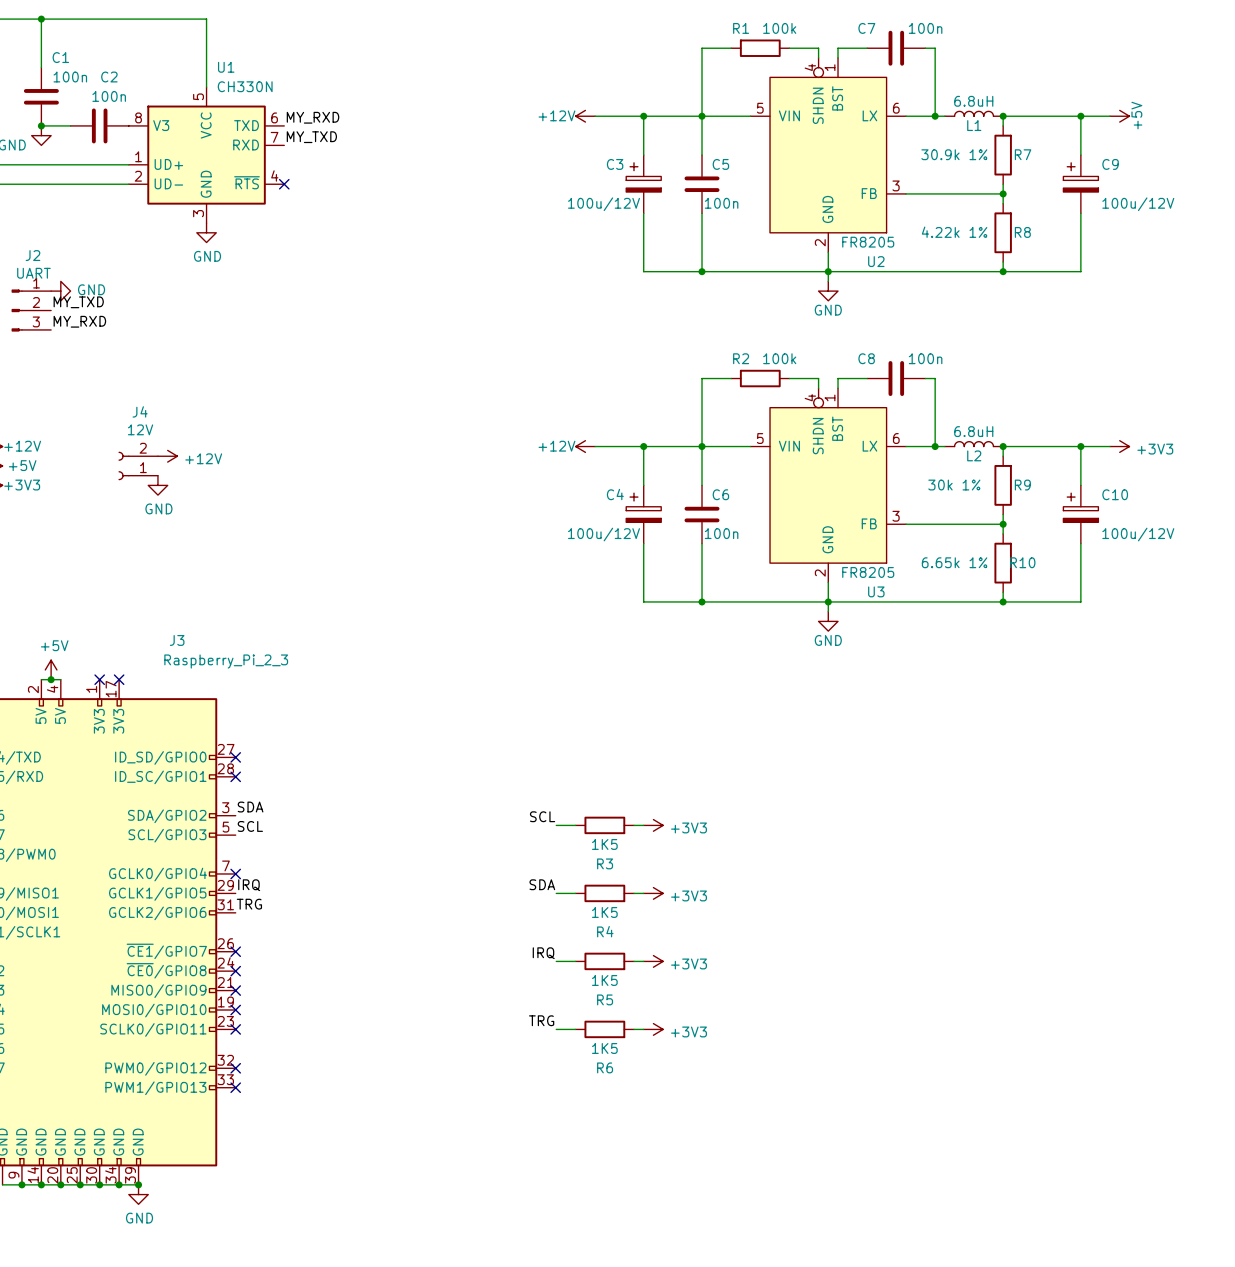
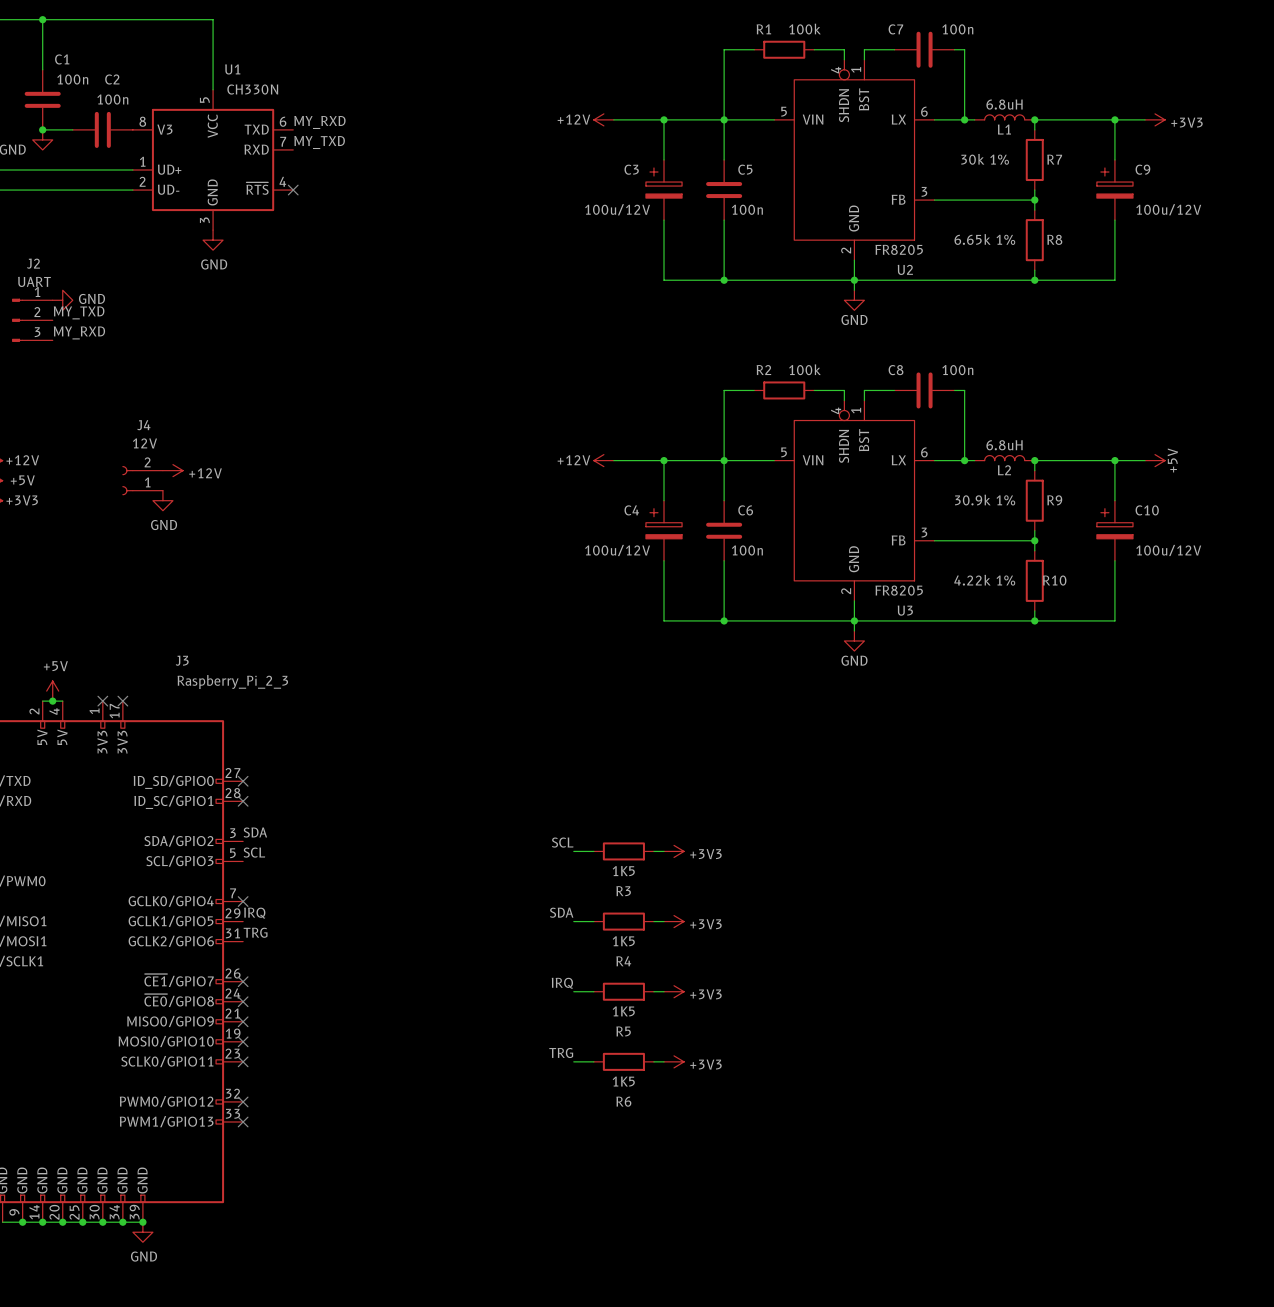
power symbol: +5V (1119, 116) -> +3V3 (1155, 119)
R7 value: 30.9k 1% (954, 154) -> 30k 1% (985, 159)
R8 value: 4.22k 1% (954, 232) -> 6.65k 1% (984, 239)
power symbol: +3V3 (1119, 446) -> +5V (1155, 460)
R9 value: 30k 1% (954, 485) -> 30.9k 1% (985, 500)
R10 value: 6.65k 1% (954, 562) -> 4.22k 1% (984, 580)

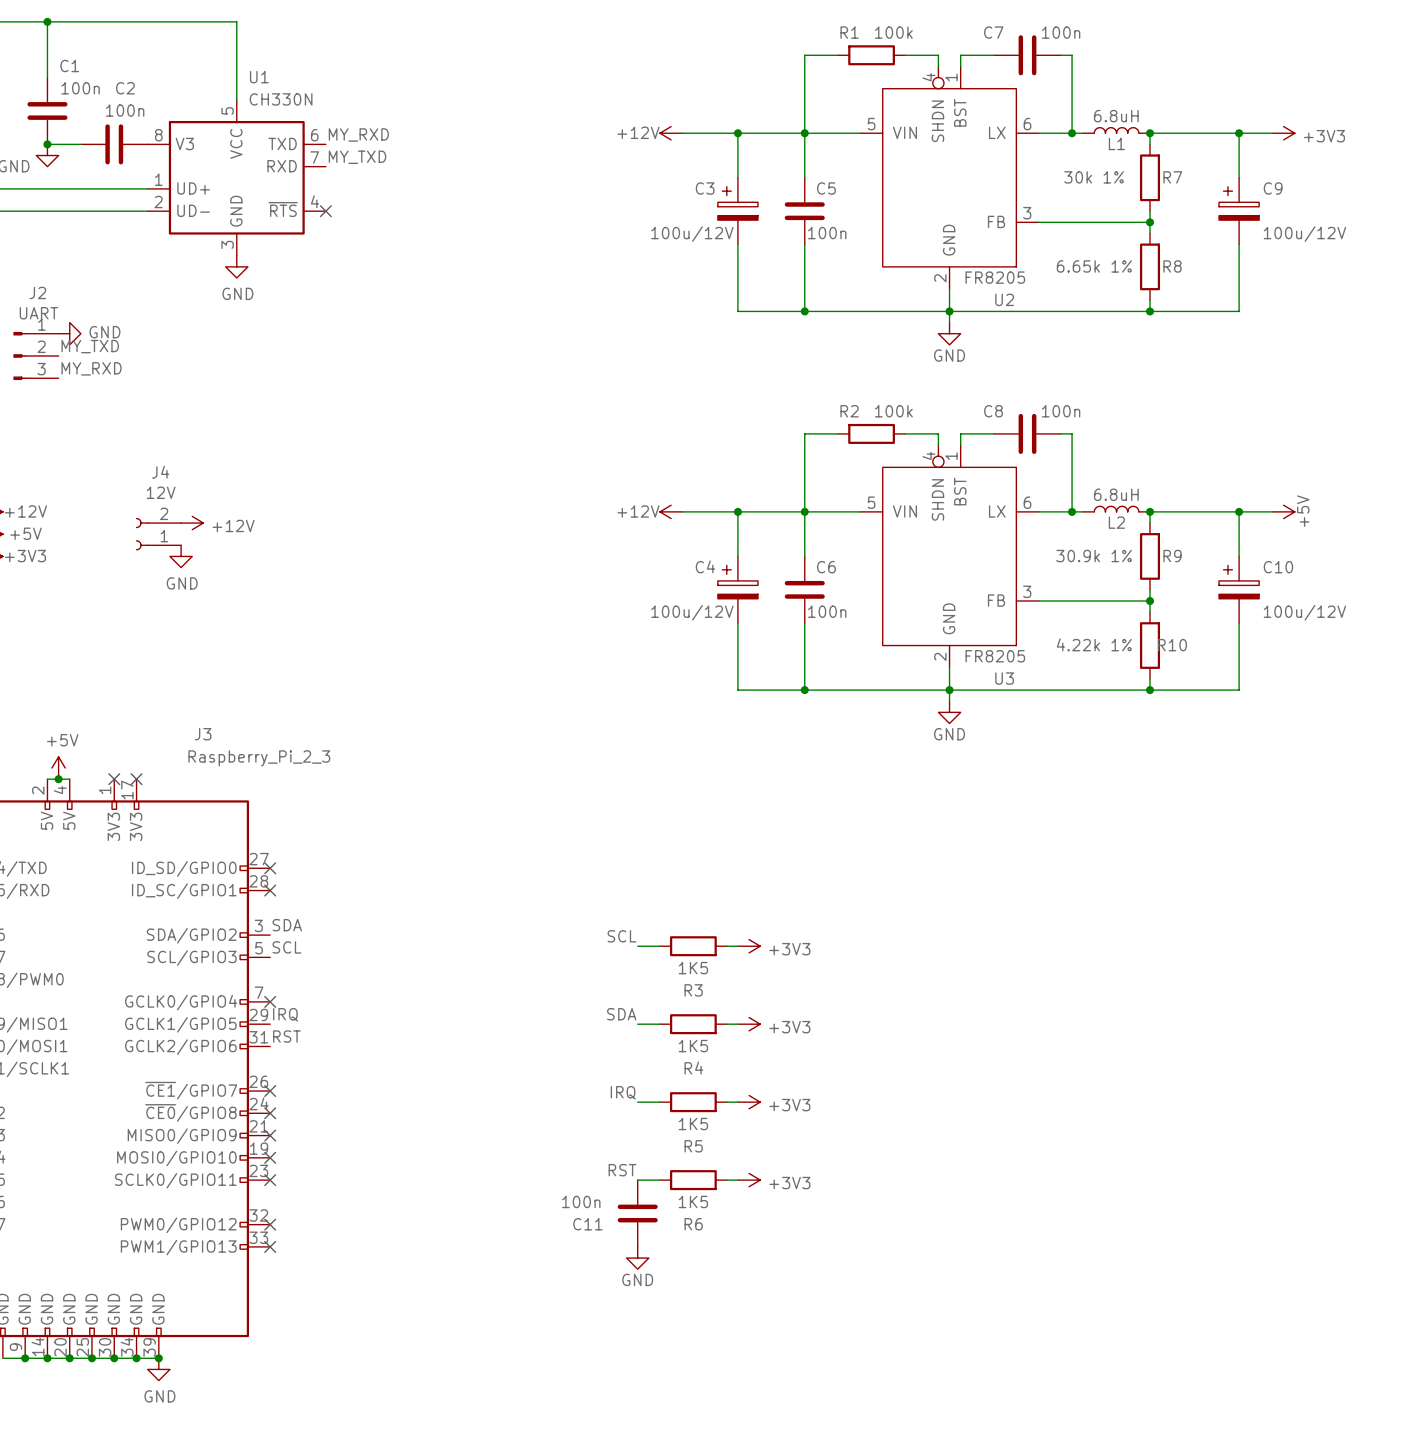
label: TRG (255, 932) -> RST (286, 1036)
label: TRG (561, 1052) -> RST (622, 1170)
C11: none -> 100n (637, 1213)
power symbol: none -> GND (637, 1258)

